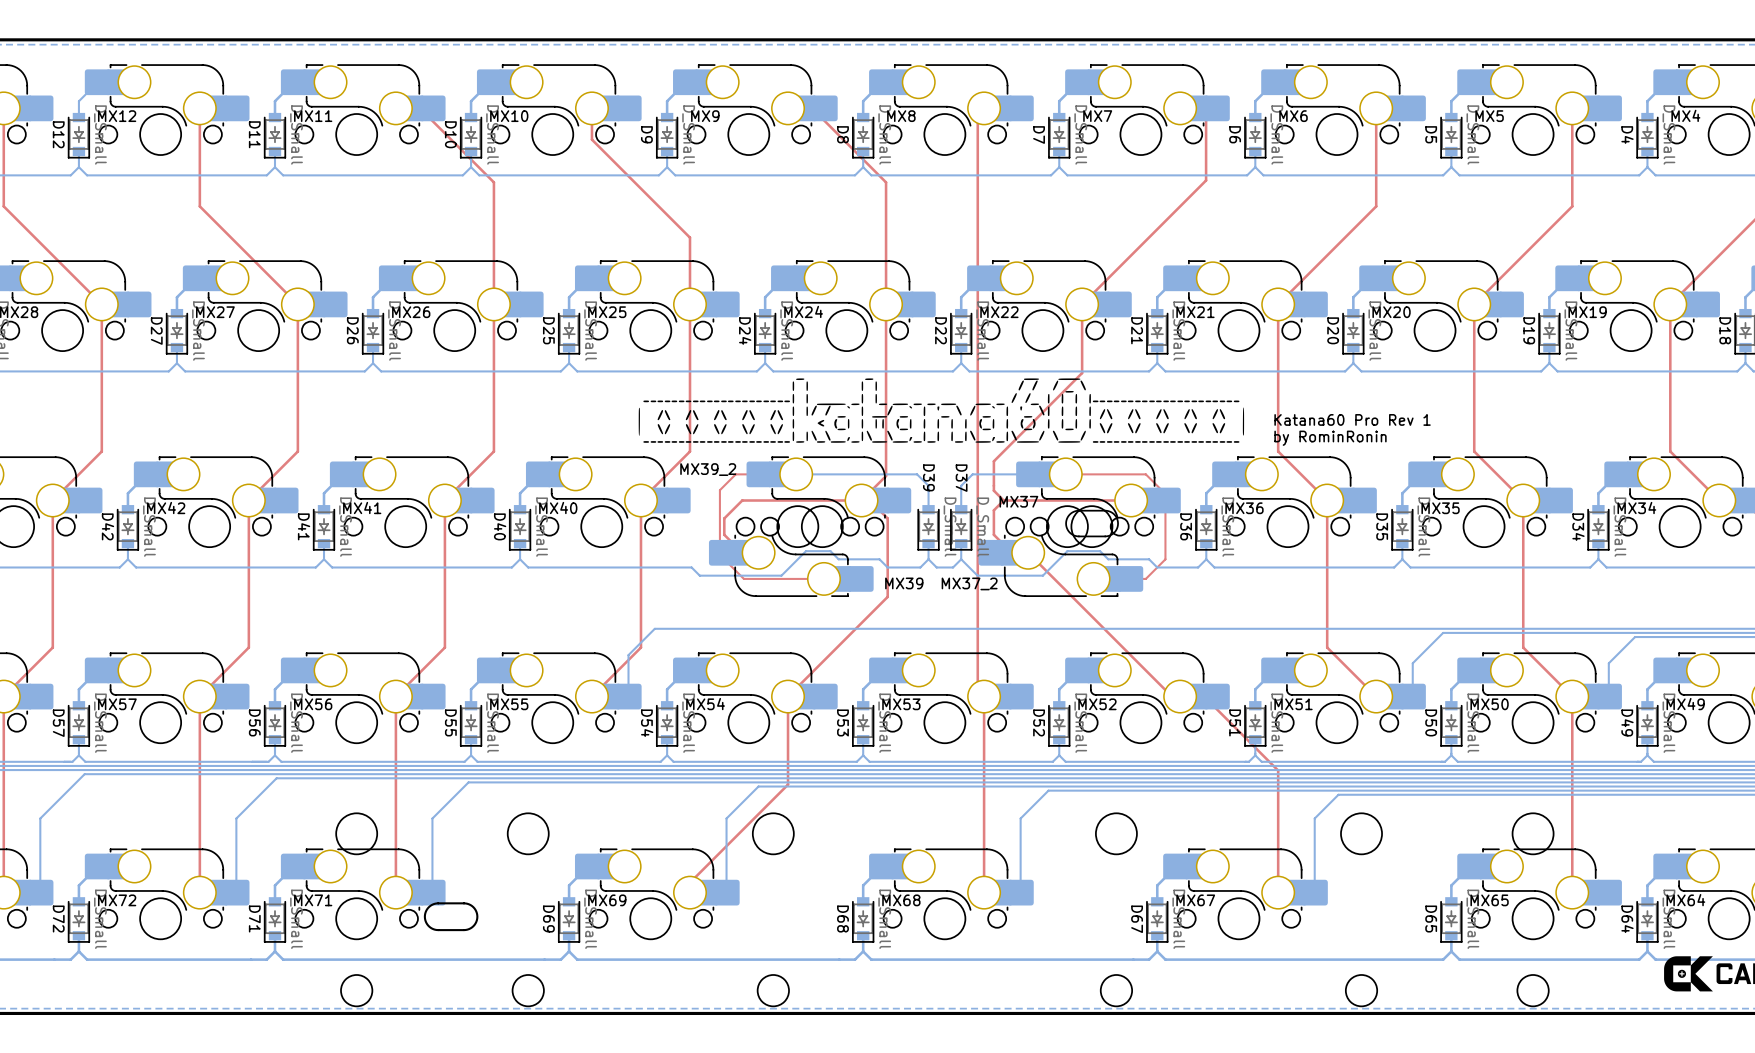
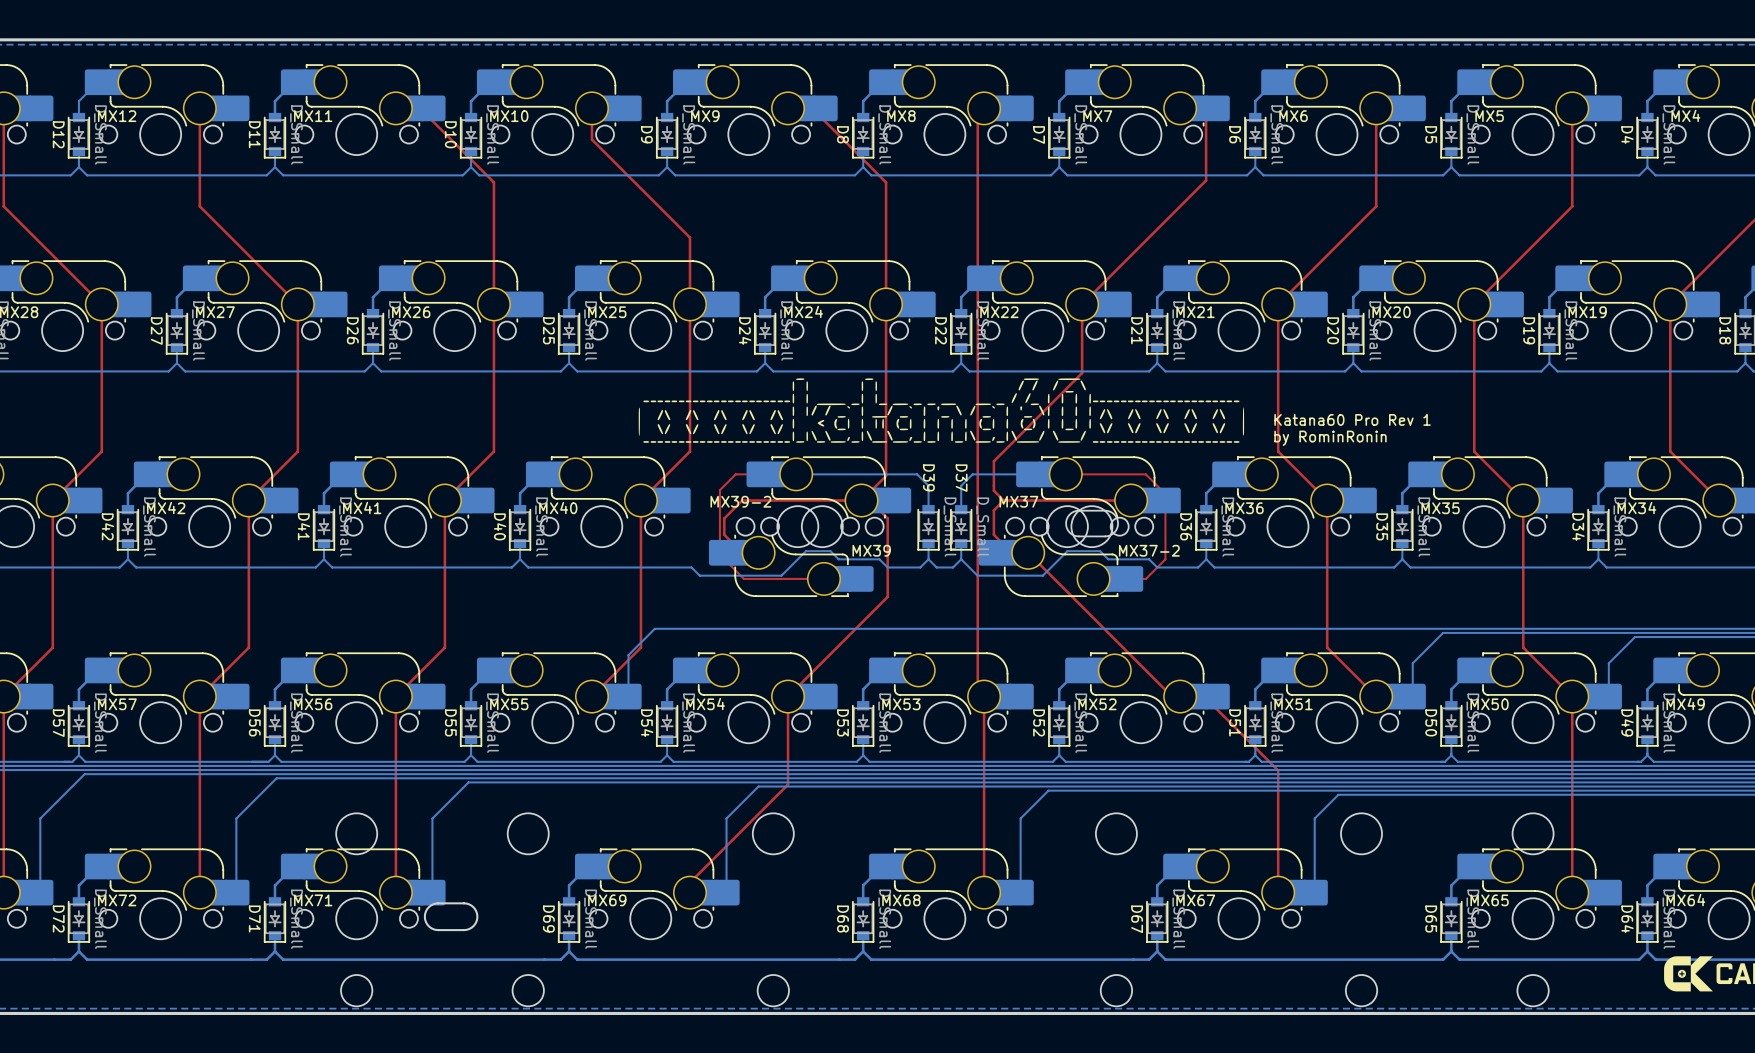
MX39_2 name: MX39_2 (708, 469) -> MX39-2 (740, 501)
MX39 name position: MX39 (904, 583) -> MX39 (871, 550)
MX37_2 name: MX37_2 (969, 583) -> MX37-2 (1149, 550)

